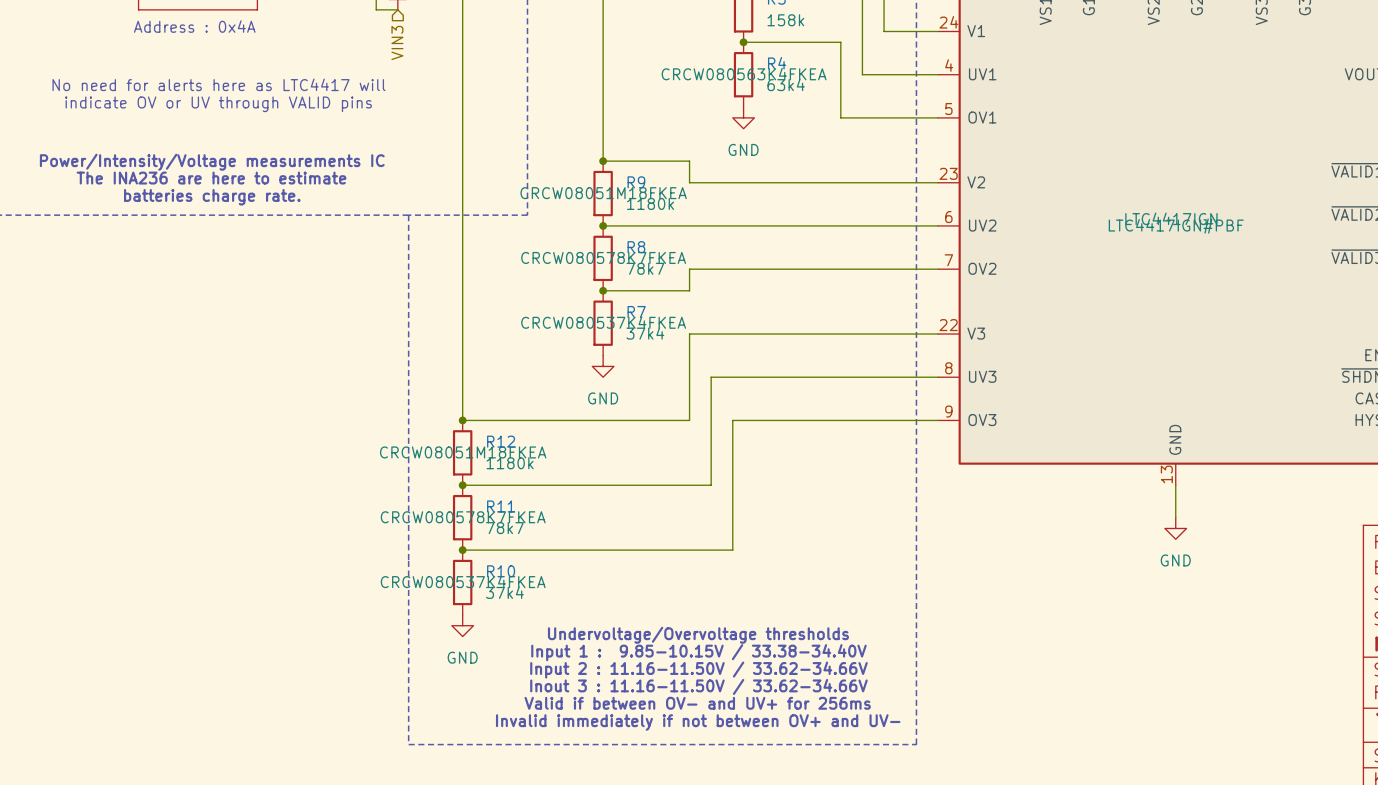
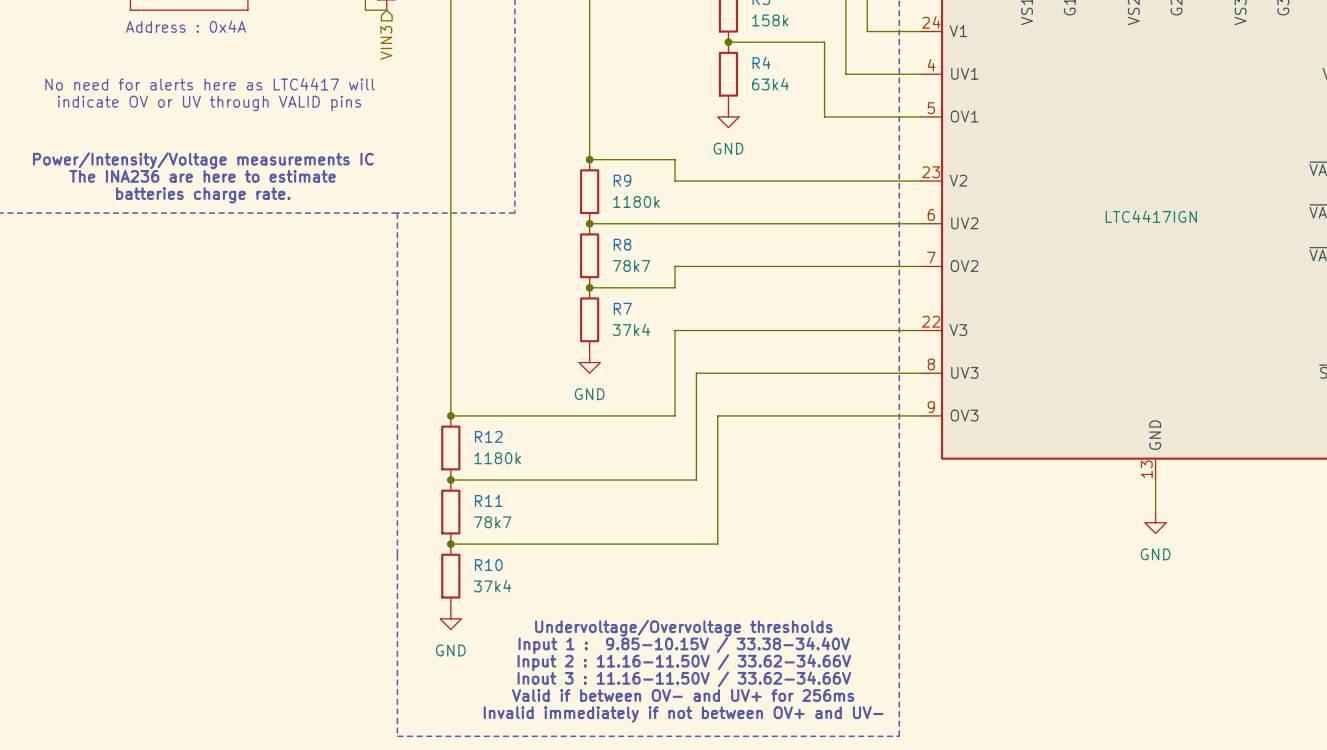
R4 text: CRCW080563K4FKEA (744, 74) -> none
R9 text: CRCW08051M18FKEA (603, 193) -> none
part text: LTC4417IGN#PBF (1176, 226) -> none
R8 text: CRCW080578K7FKEA (603, 257) -> none
R7 text: CRCW080537K4FKEA (603, 322) -> none
R12 text: CRCW08051M18FKEA (463, 452) -> none
R11 text: CRCW080578K7FKEA (463, 517) -> none
R10 text: CRCW080537K4FKEA (463, 581) -> none

